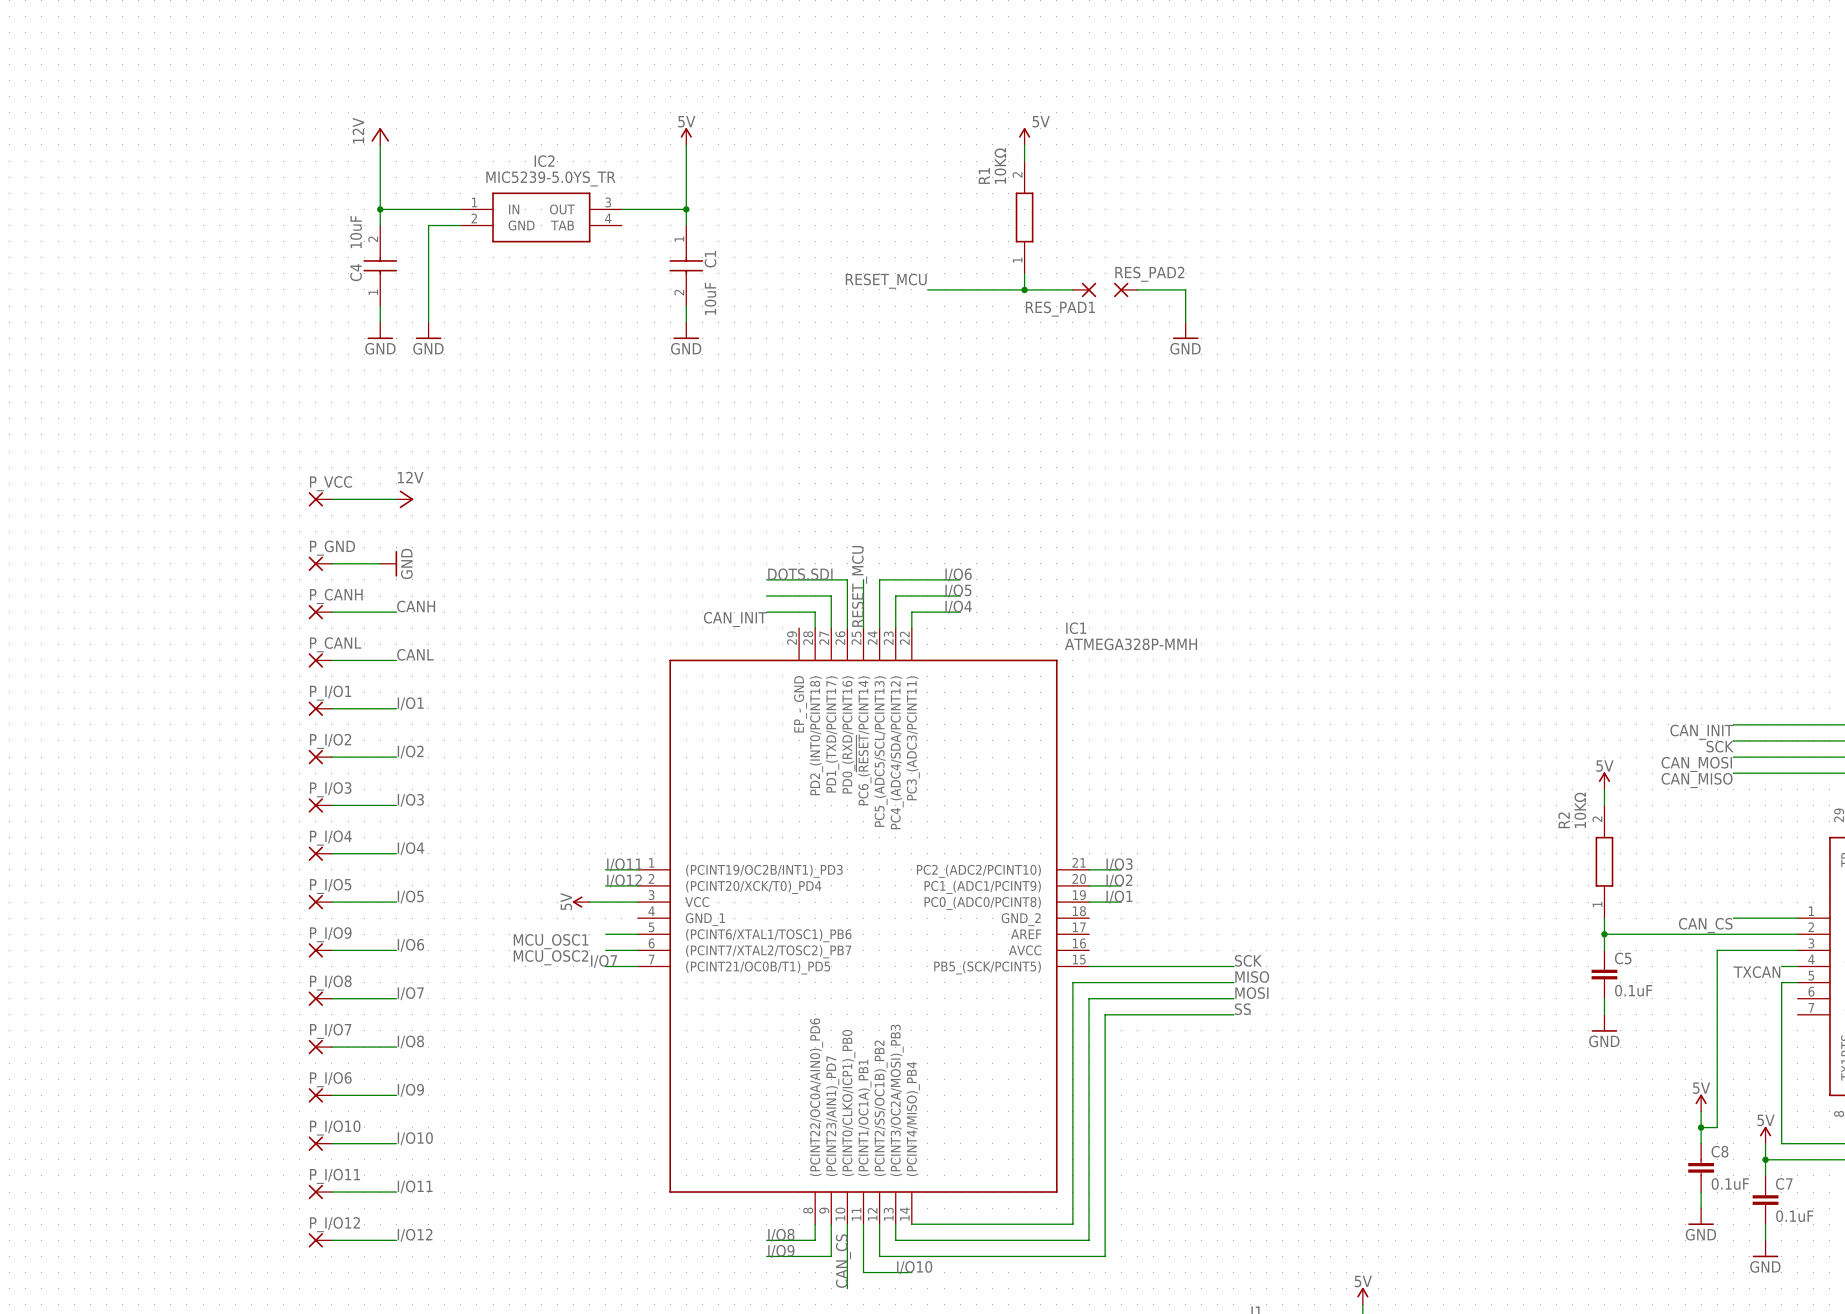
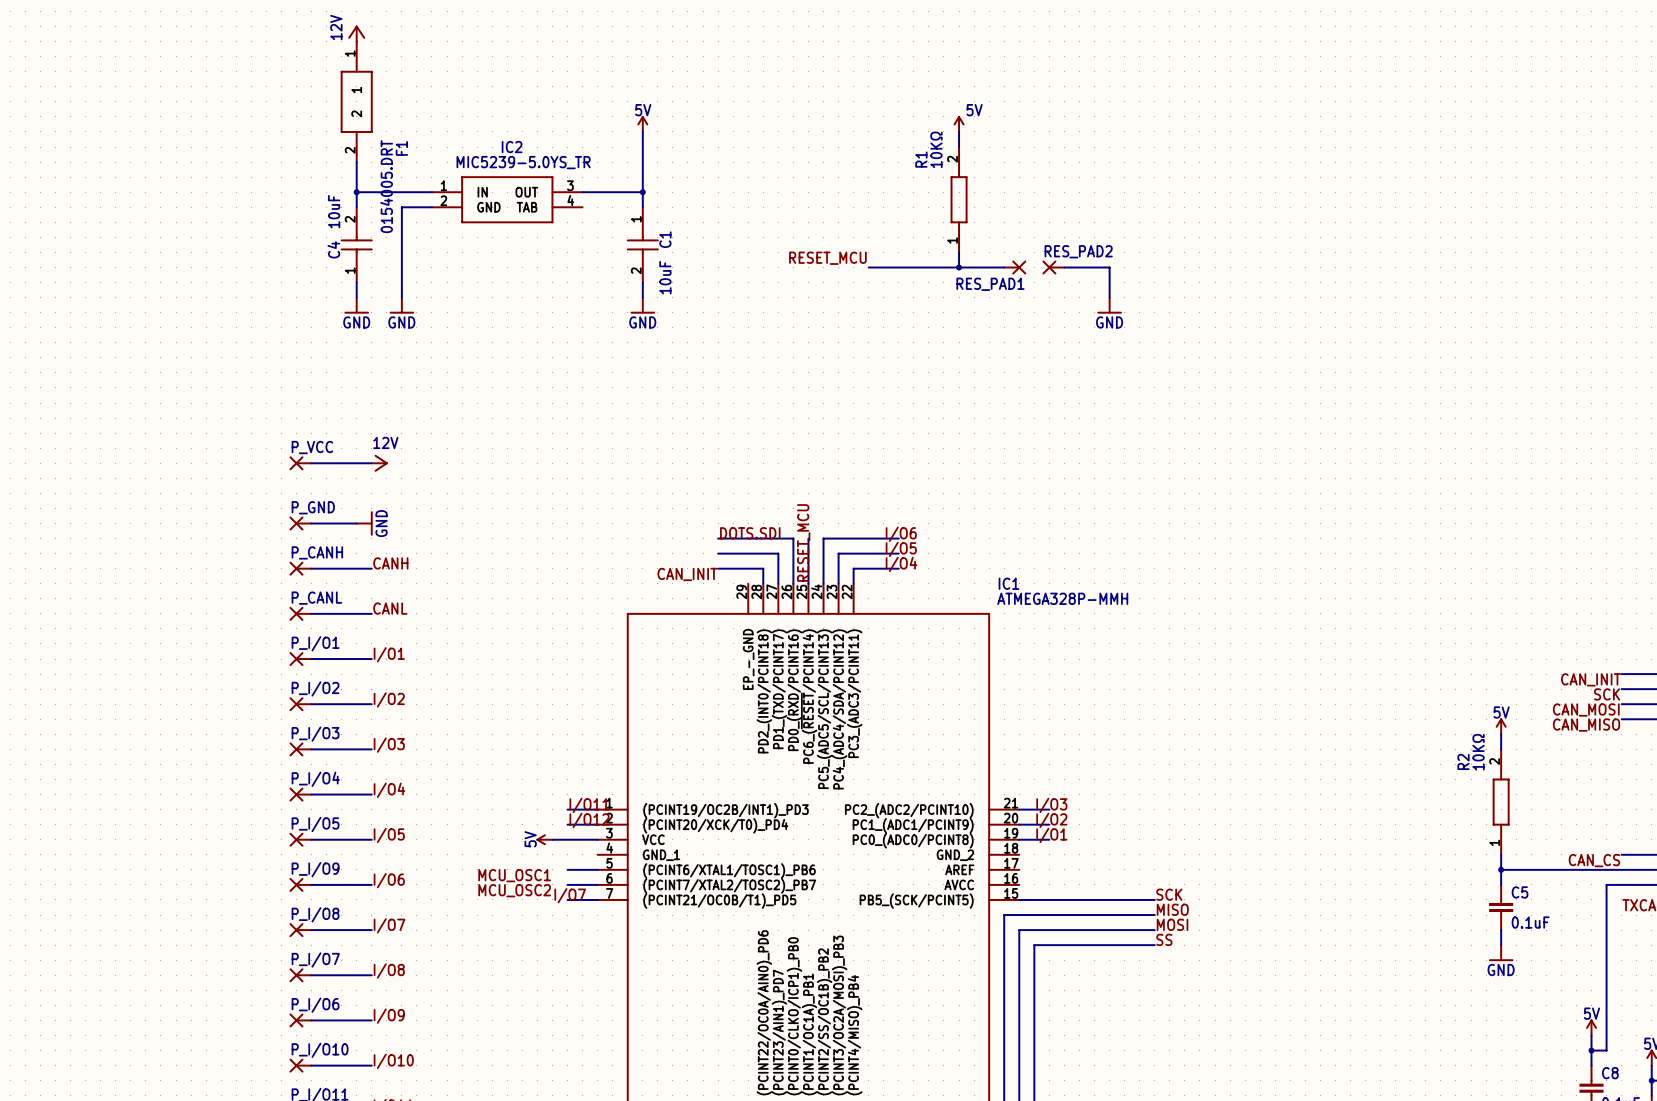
F1: none -> 0154005.DRT (356, 101)
power symbol position: 12V (380, 136) -> 12V (356, 33)

